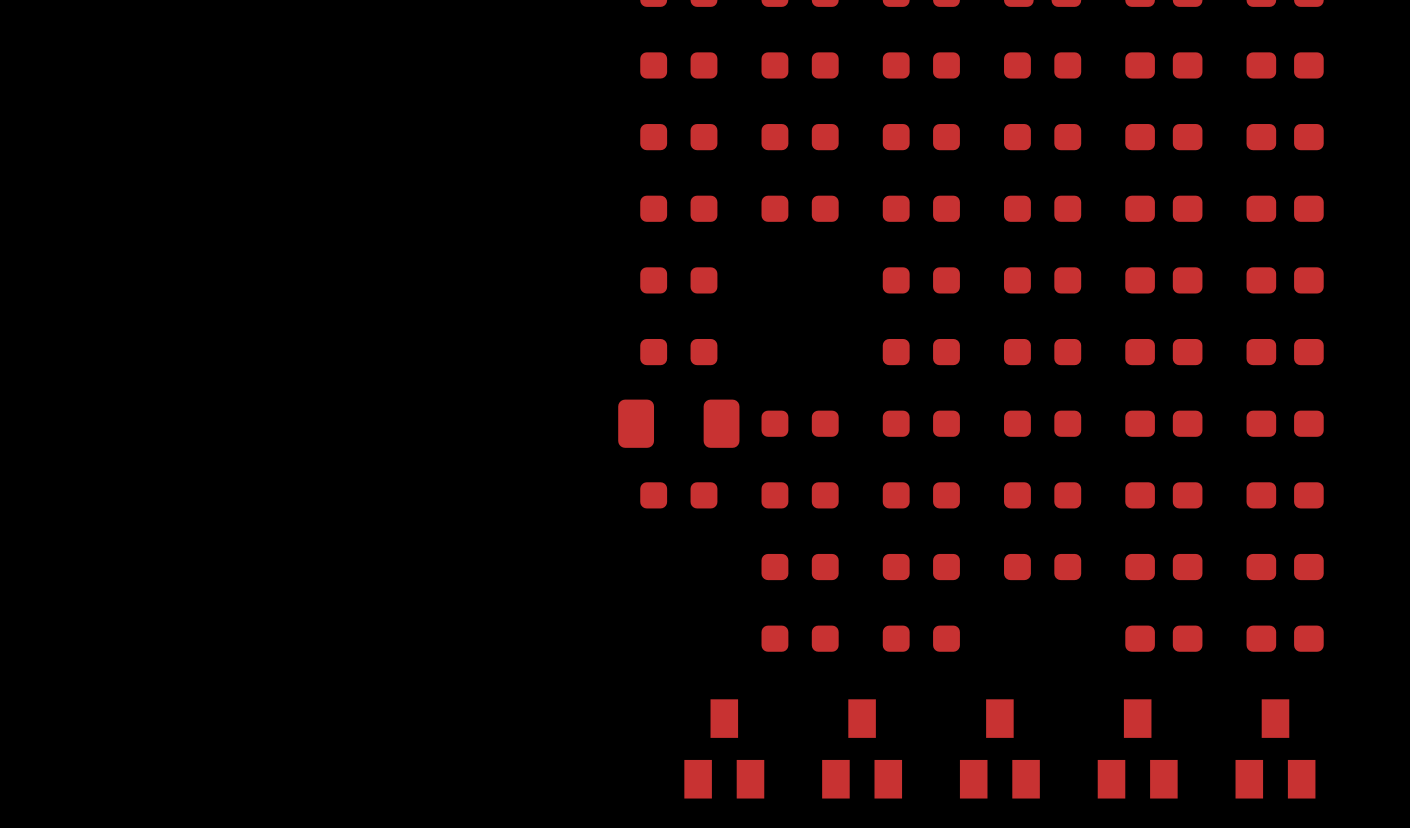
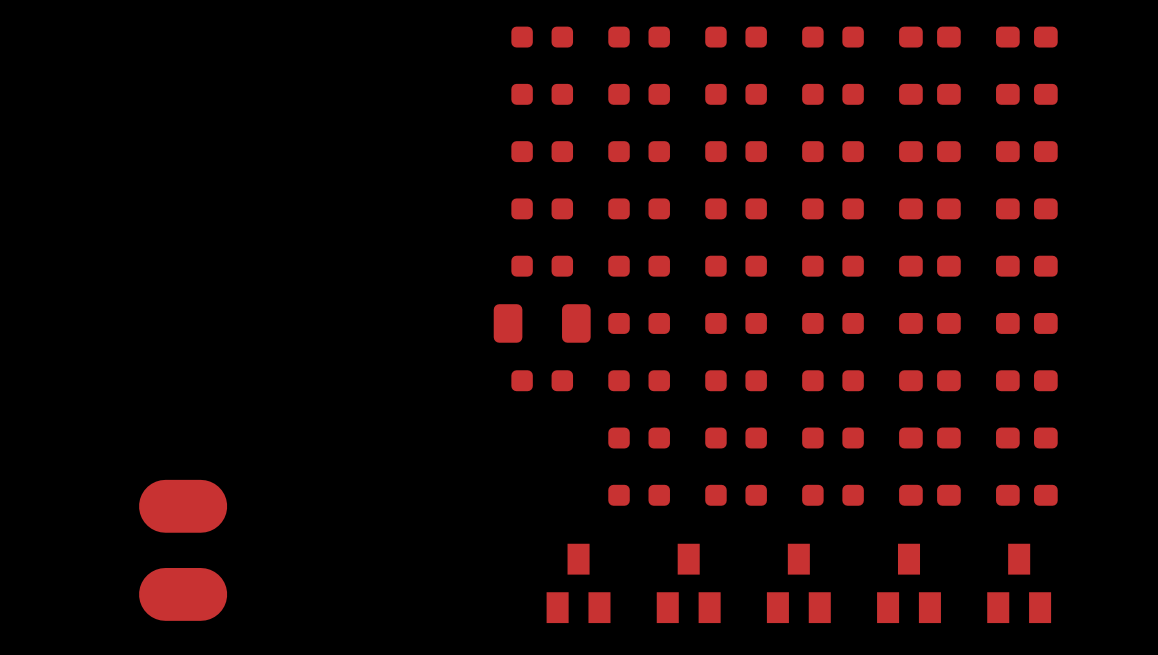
part: none -> (639, 208)
part: none -> (639, 266)
part: none -> (832, 495)
part: none -> (183, 506)
part: none -> (183, 594)

